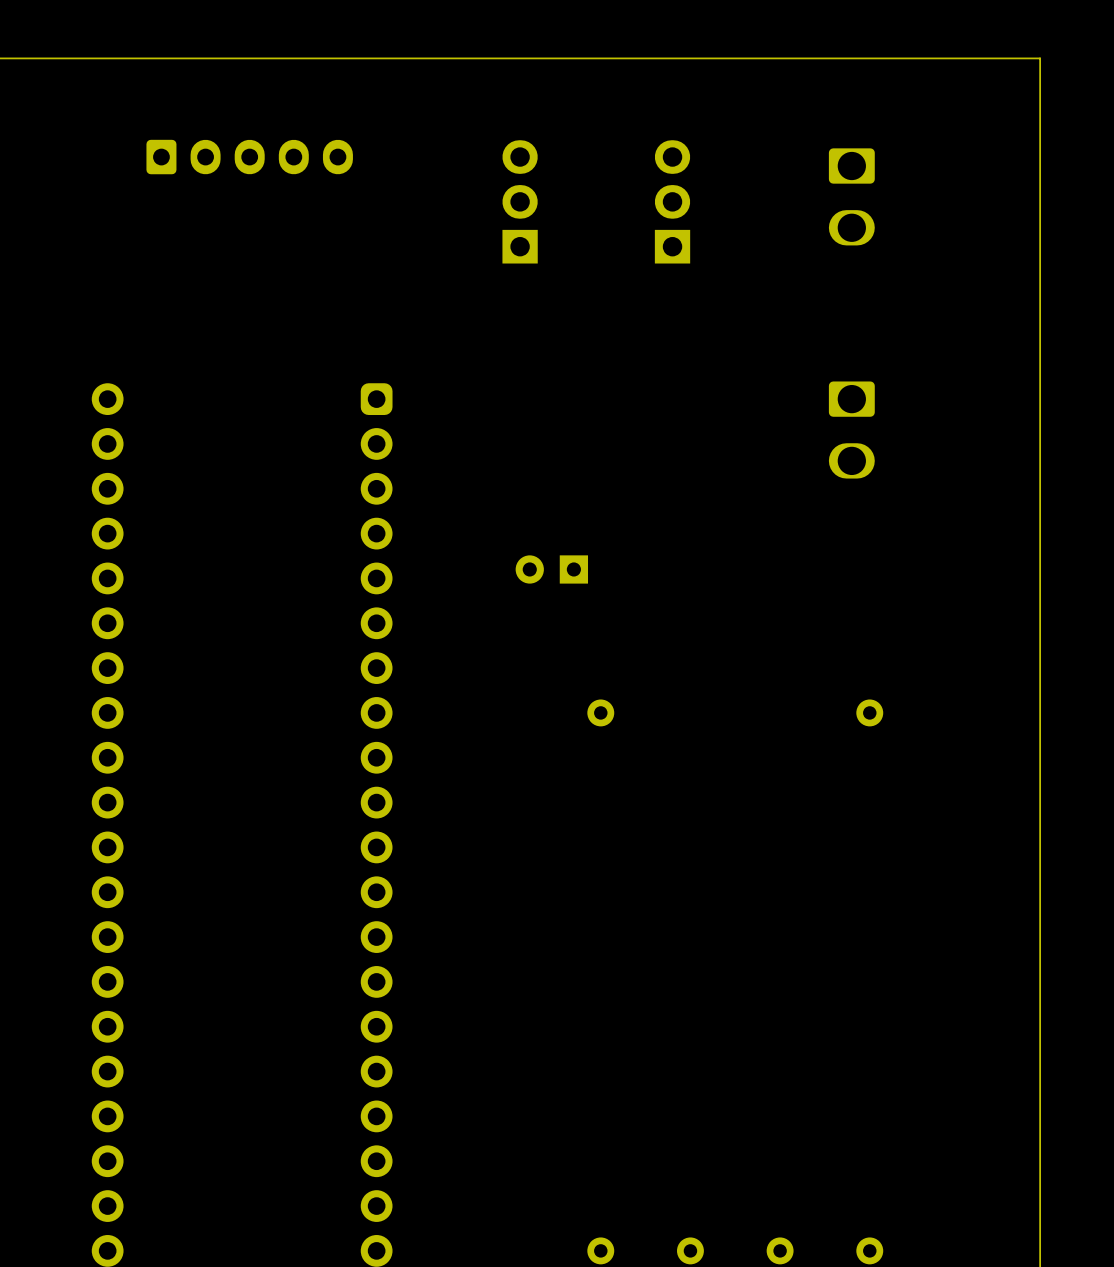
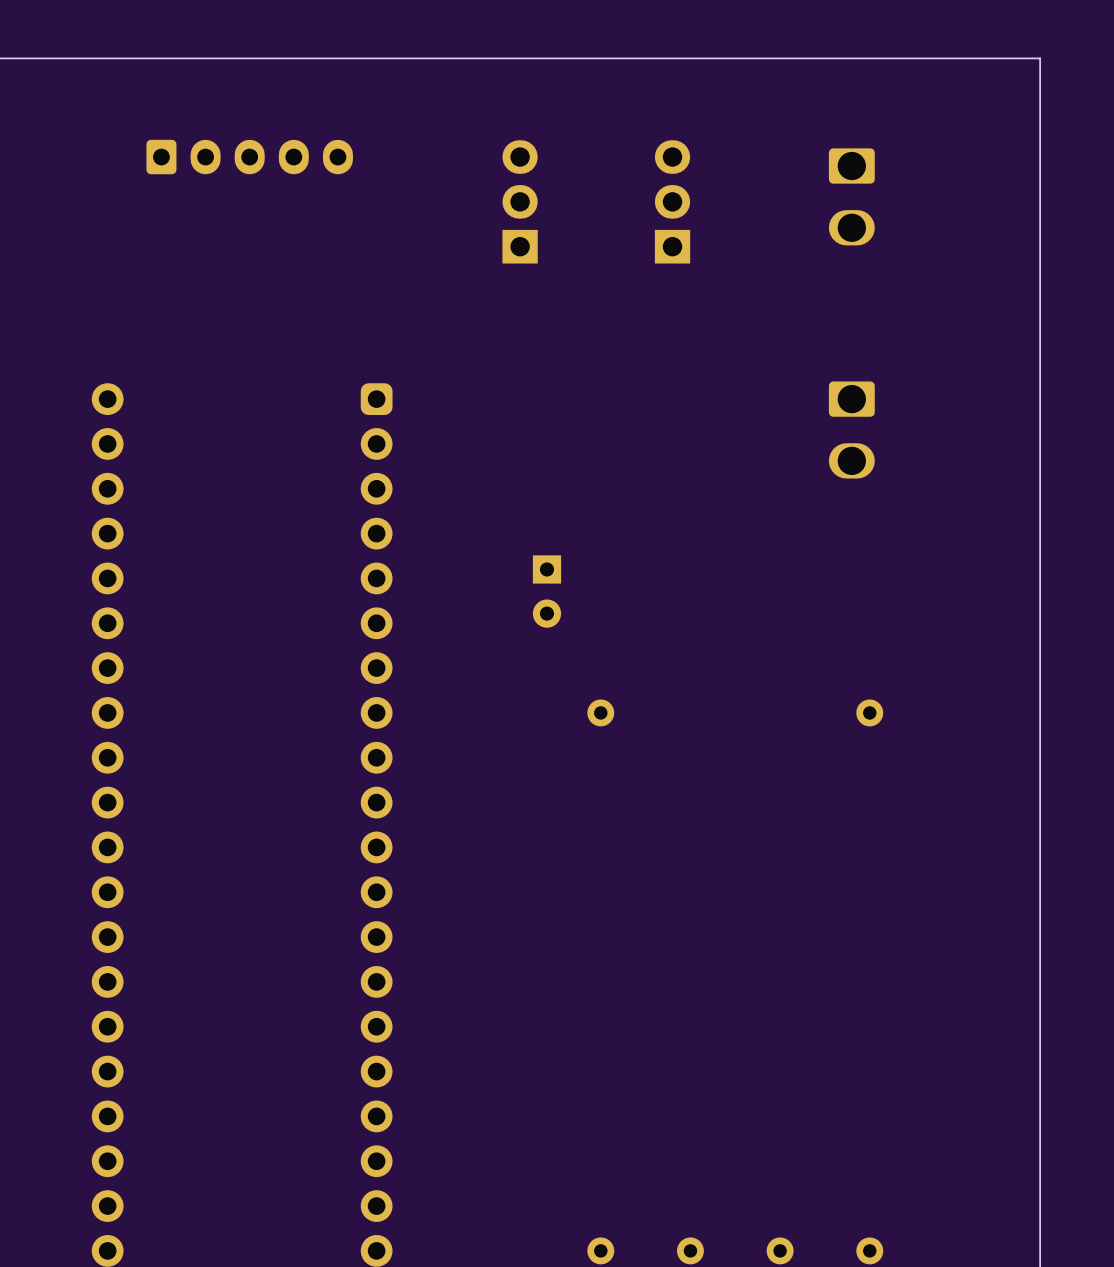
part rotation: 0° (551, 569) -> 90° counterclockwise (546, 591)

